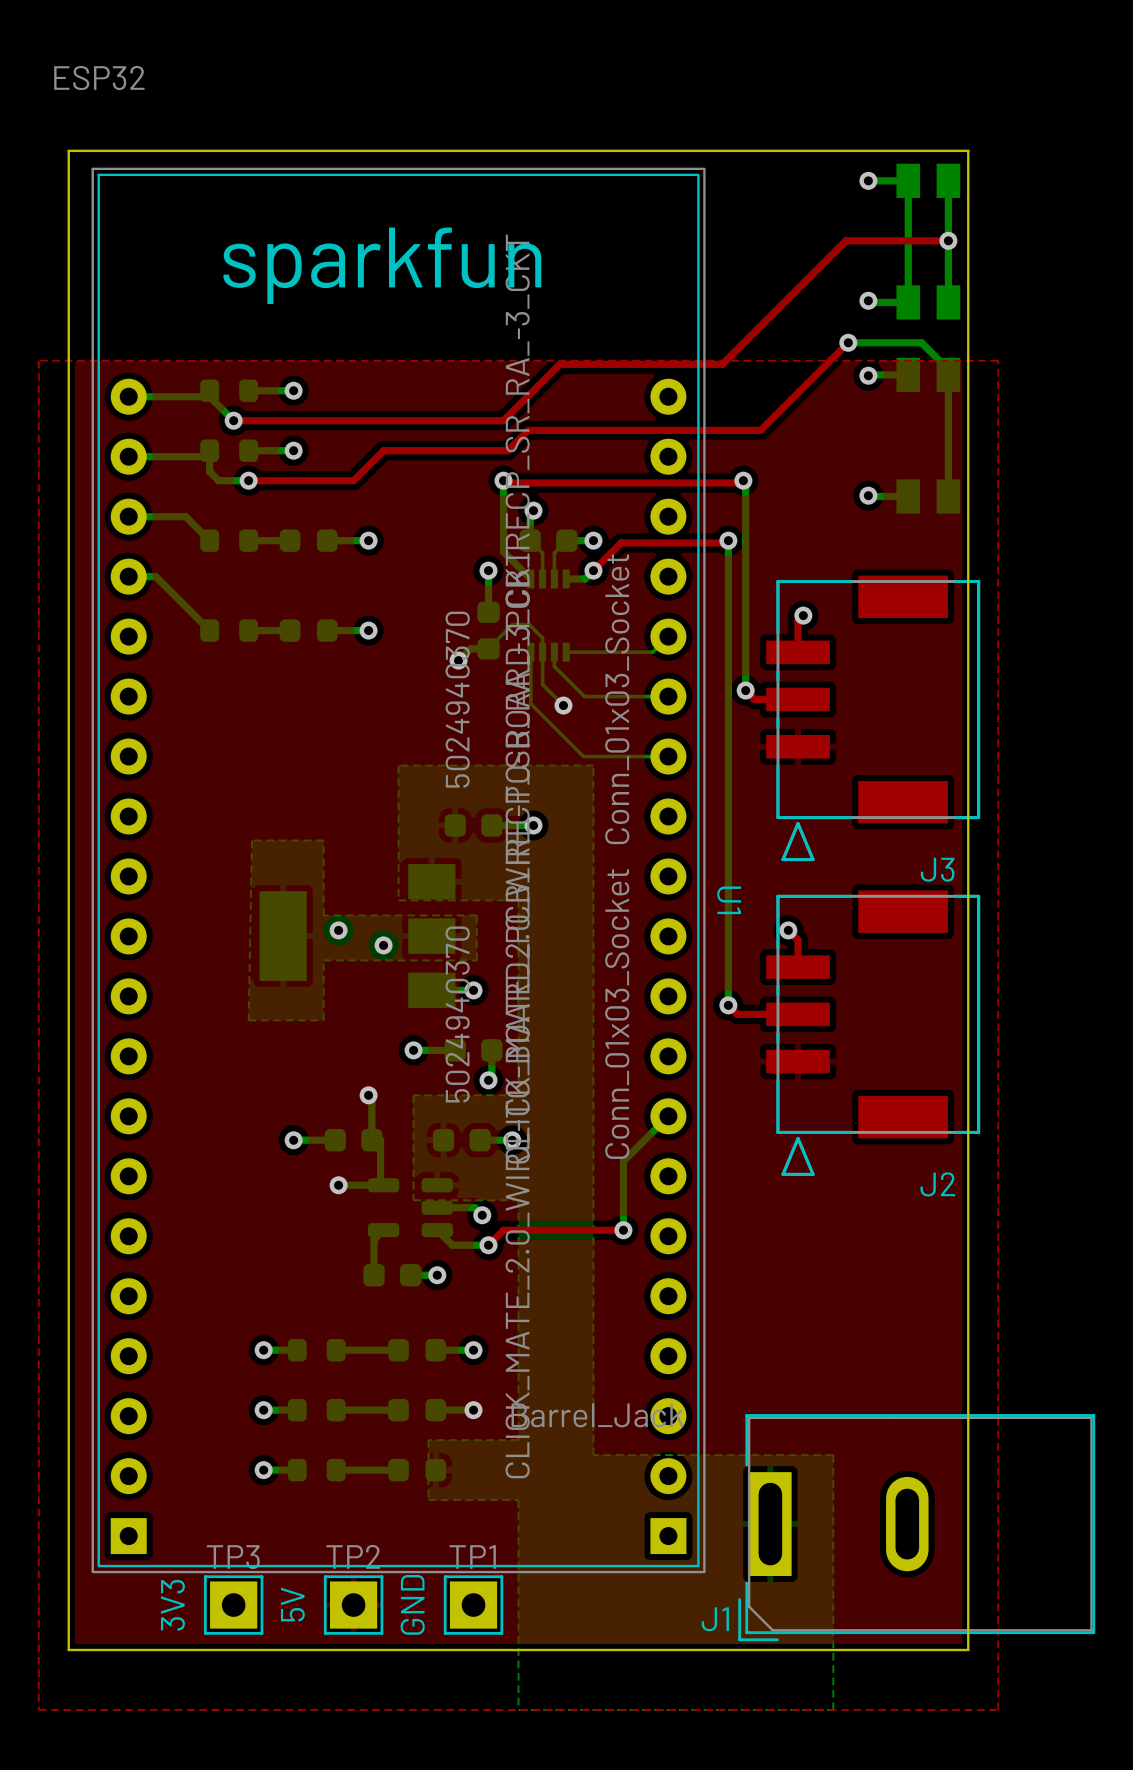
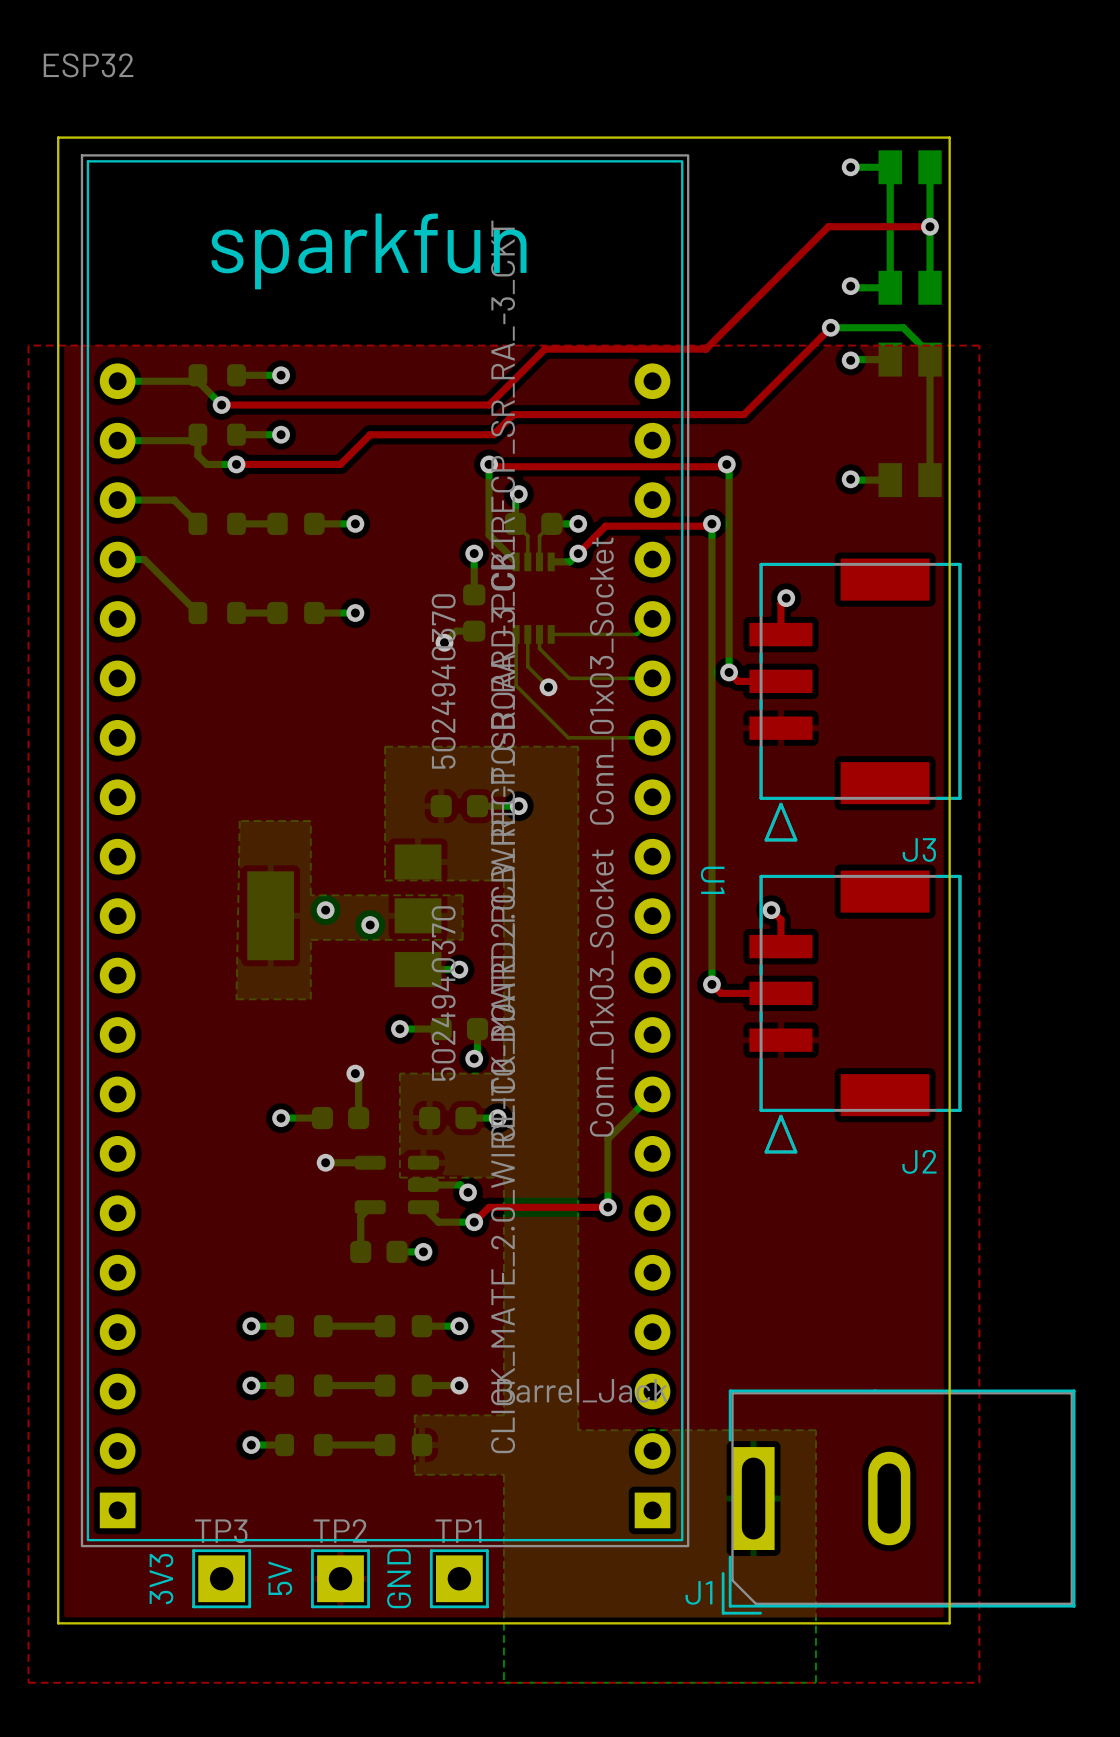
bottom track: (488, 648) (512, 624) (529, 624) (542, 637) (542, 652) -> none
bottom track: (380, 1140) (380, 1182) (383, 1185) -> none

